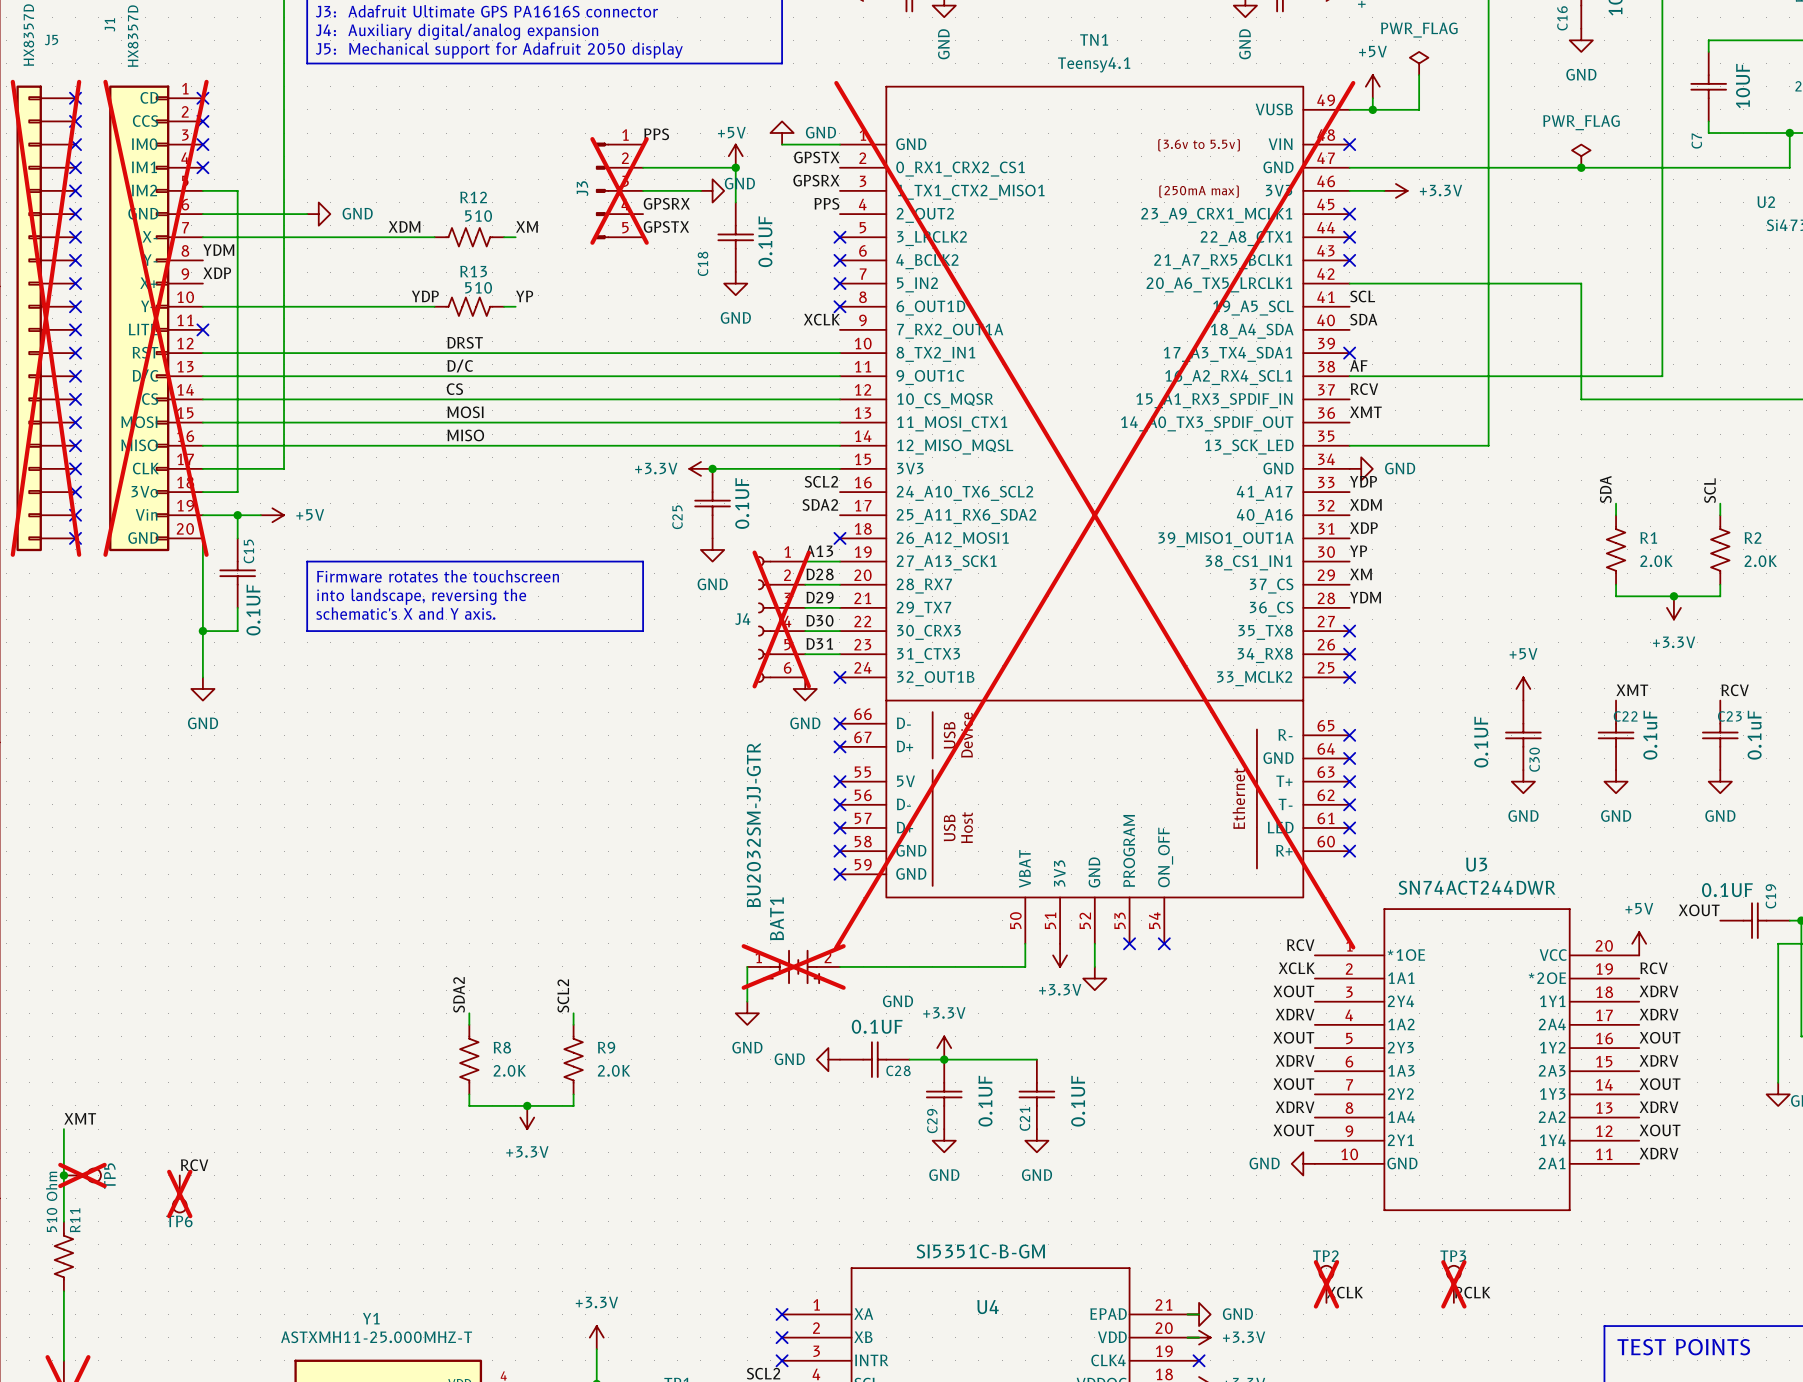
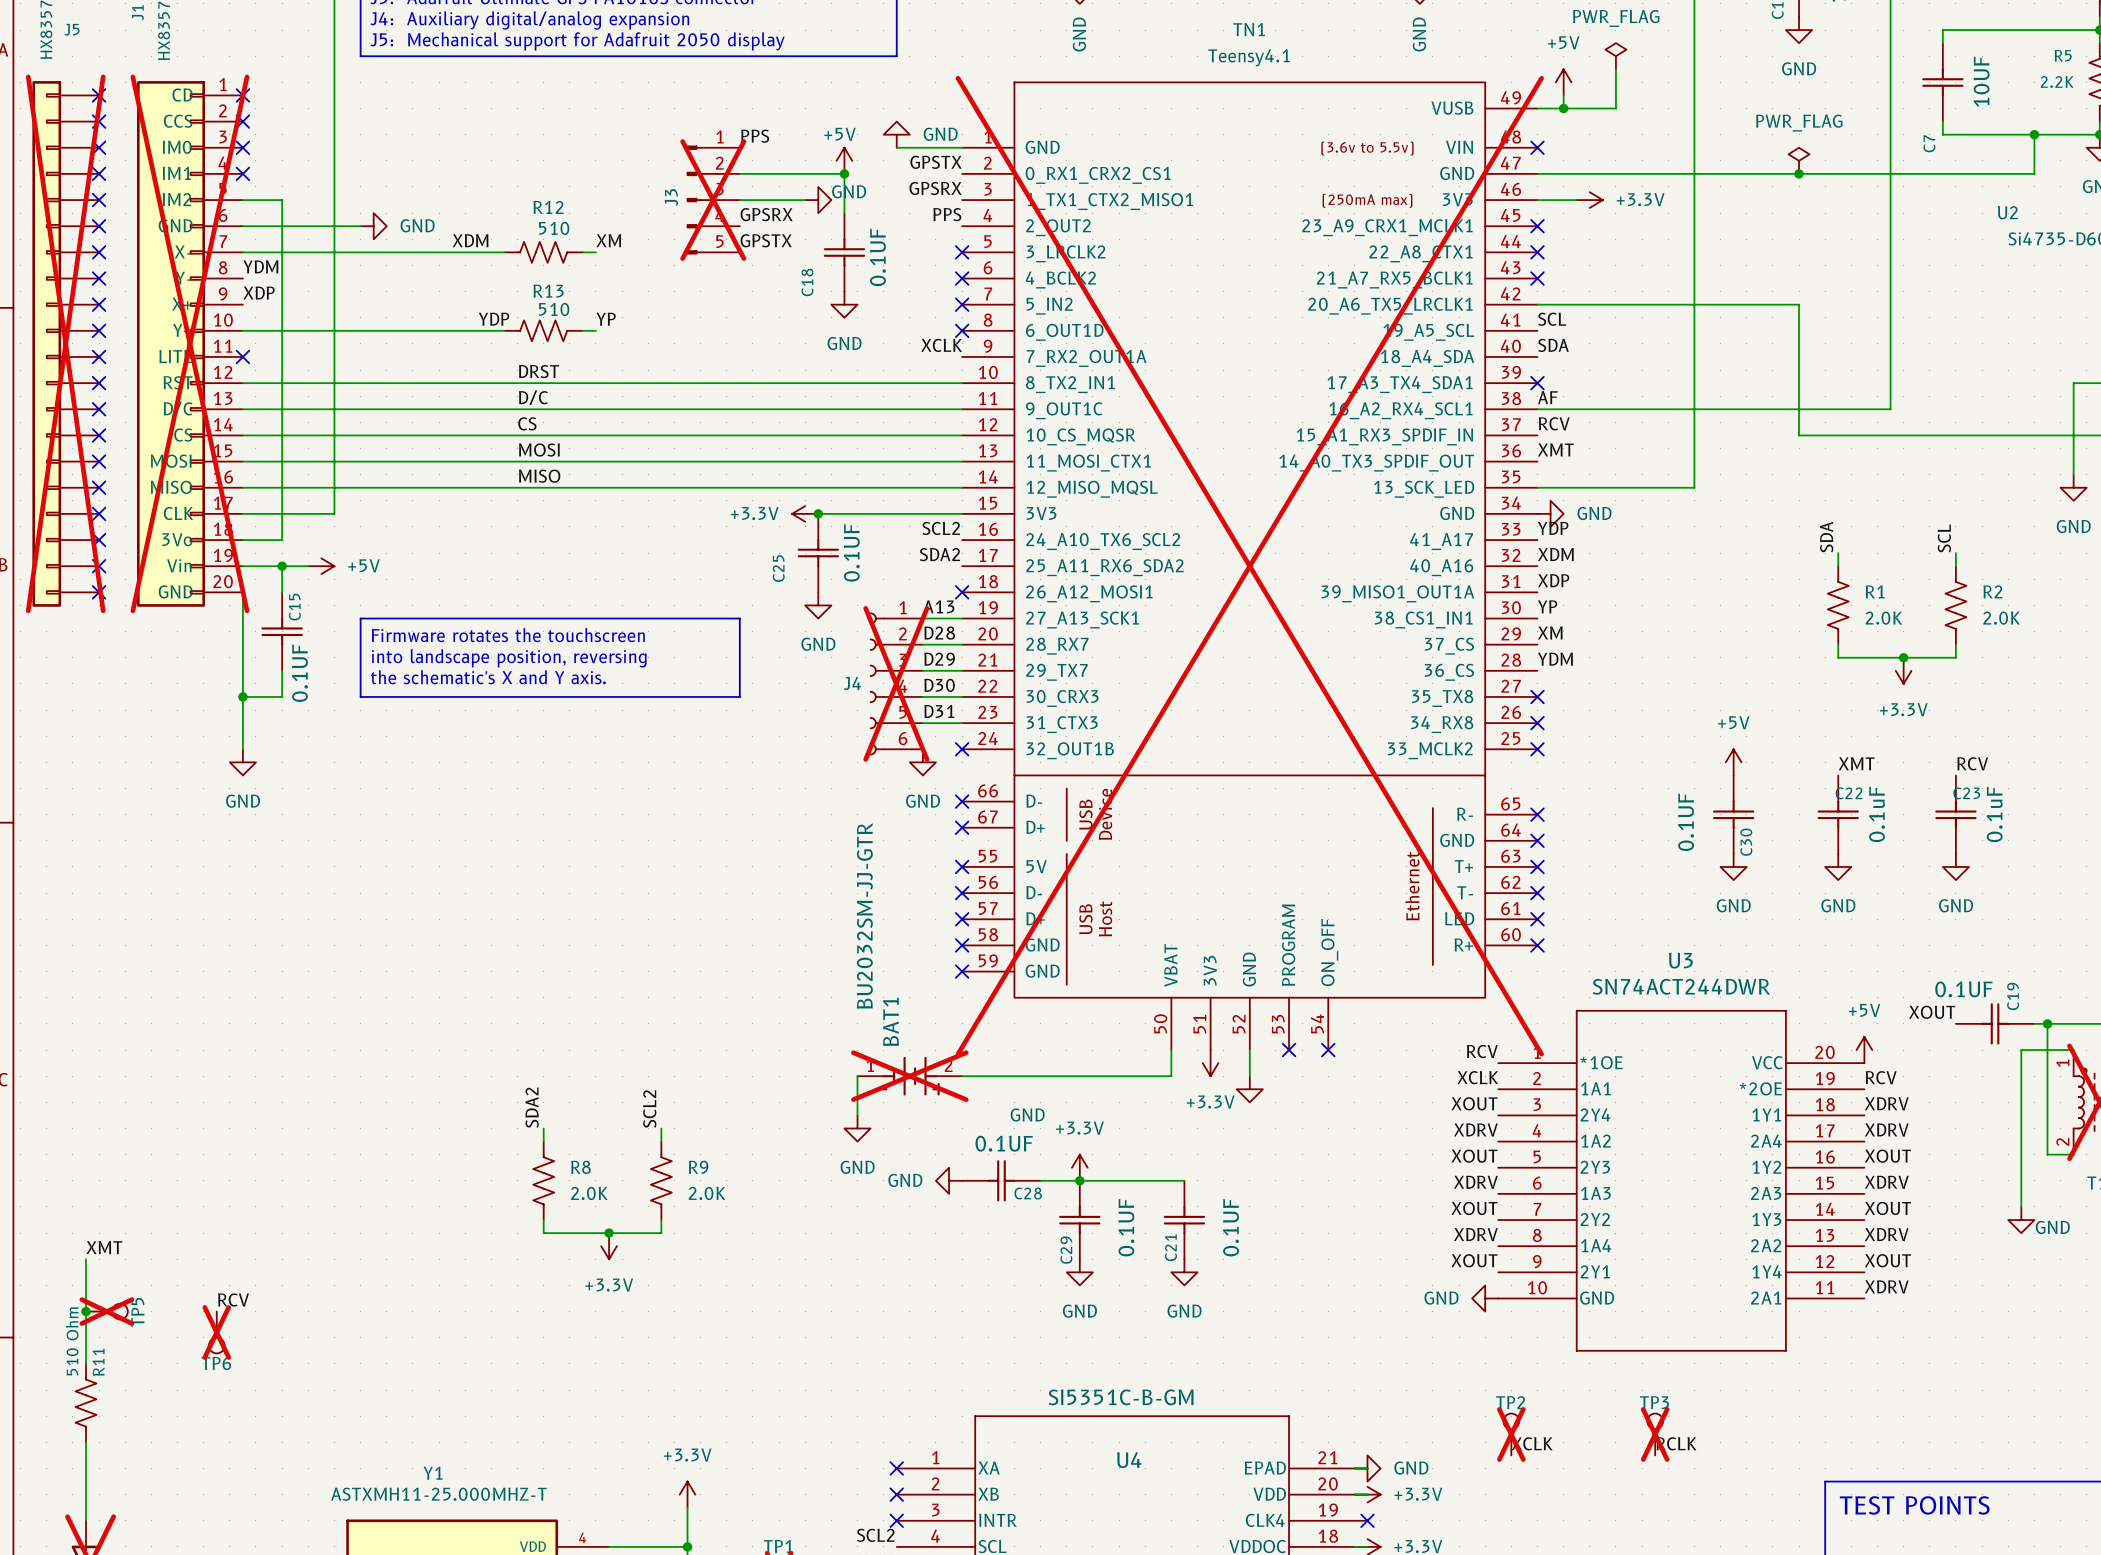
text: into landscape, reversing the (421, 596) -> into landscape position, reversing (509, 658)
text: schematic's X and Y axis. (405, 613) -> the schematic's X and Y axis. (488, 677)

